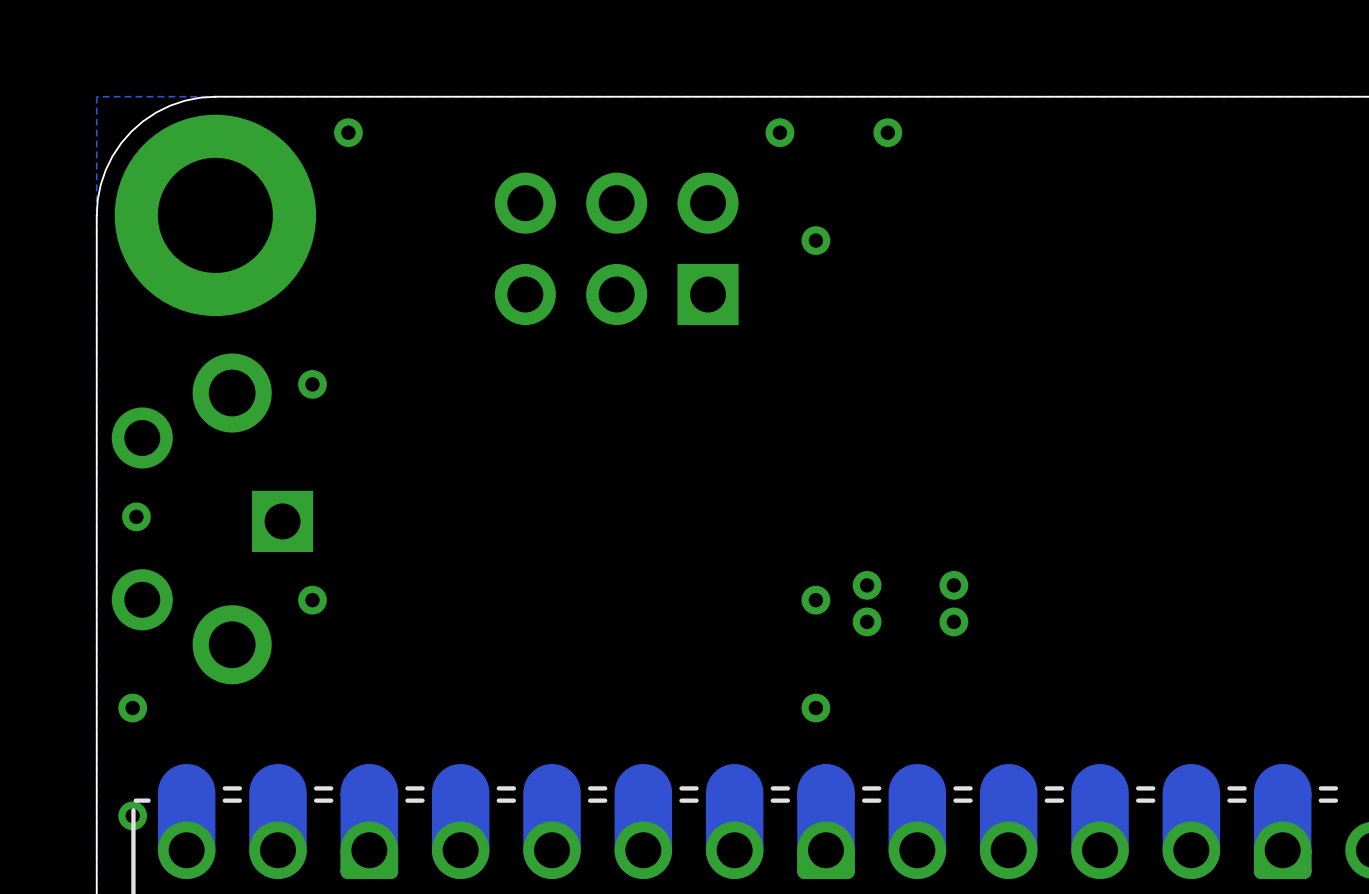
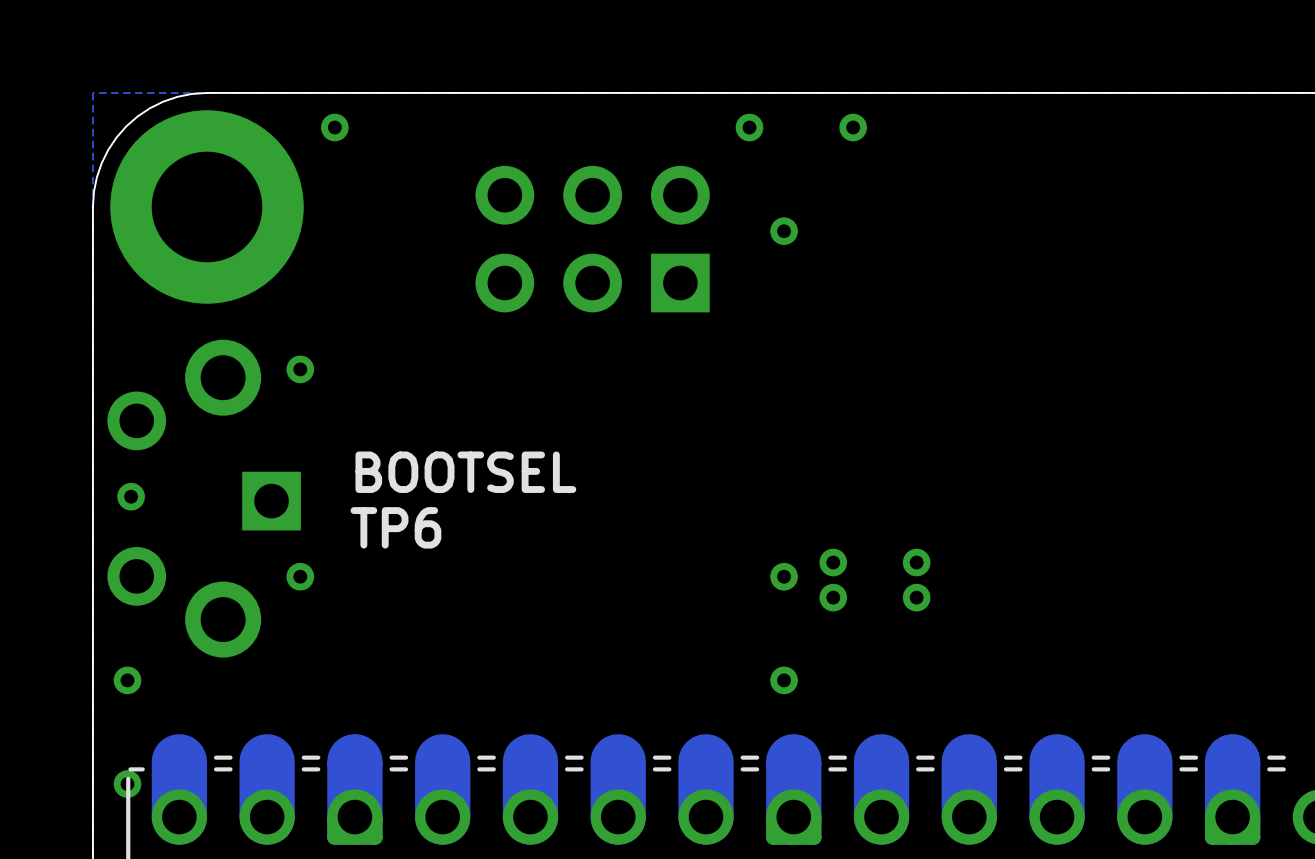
text: none -> BOOTSEL (465, 472)
text: none -> TP6 (395, 527)

